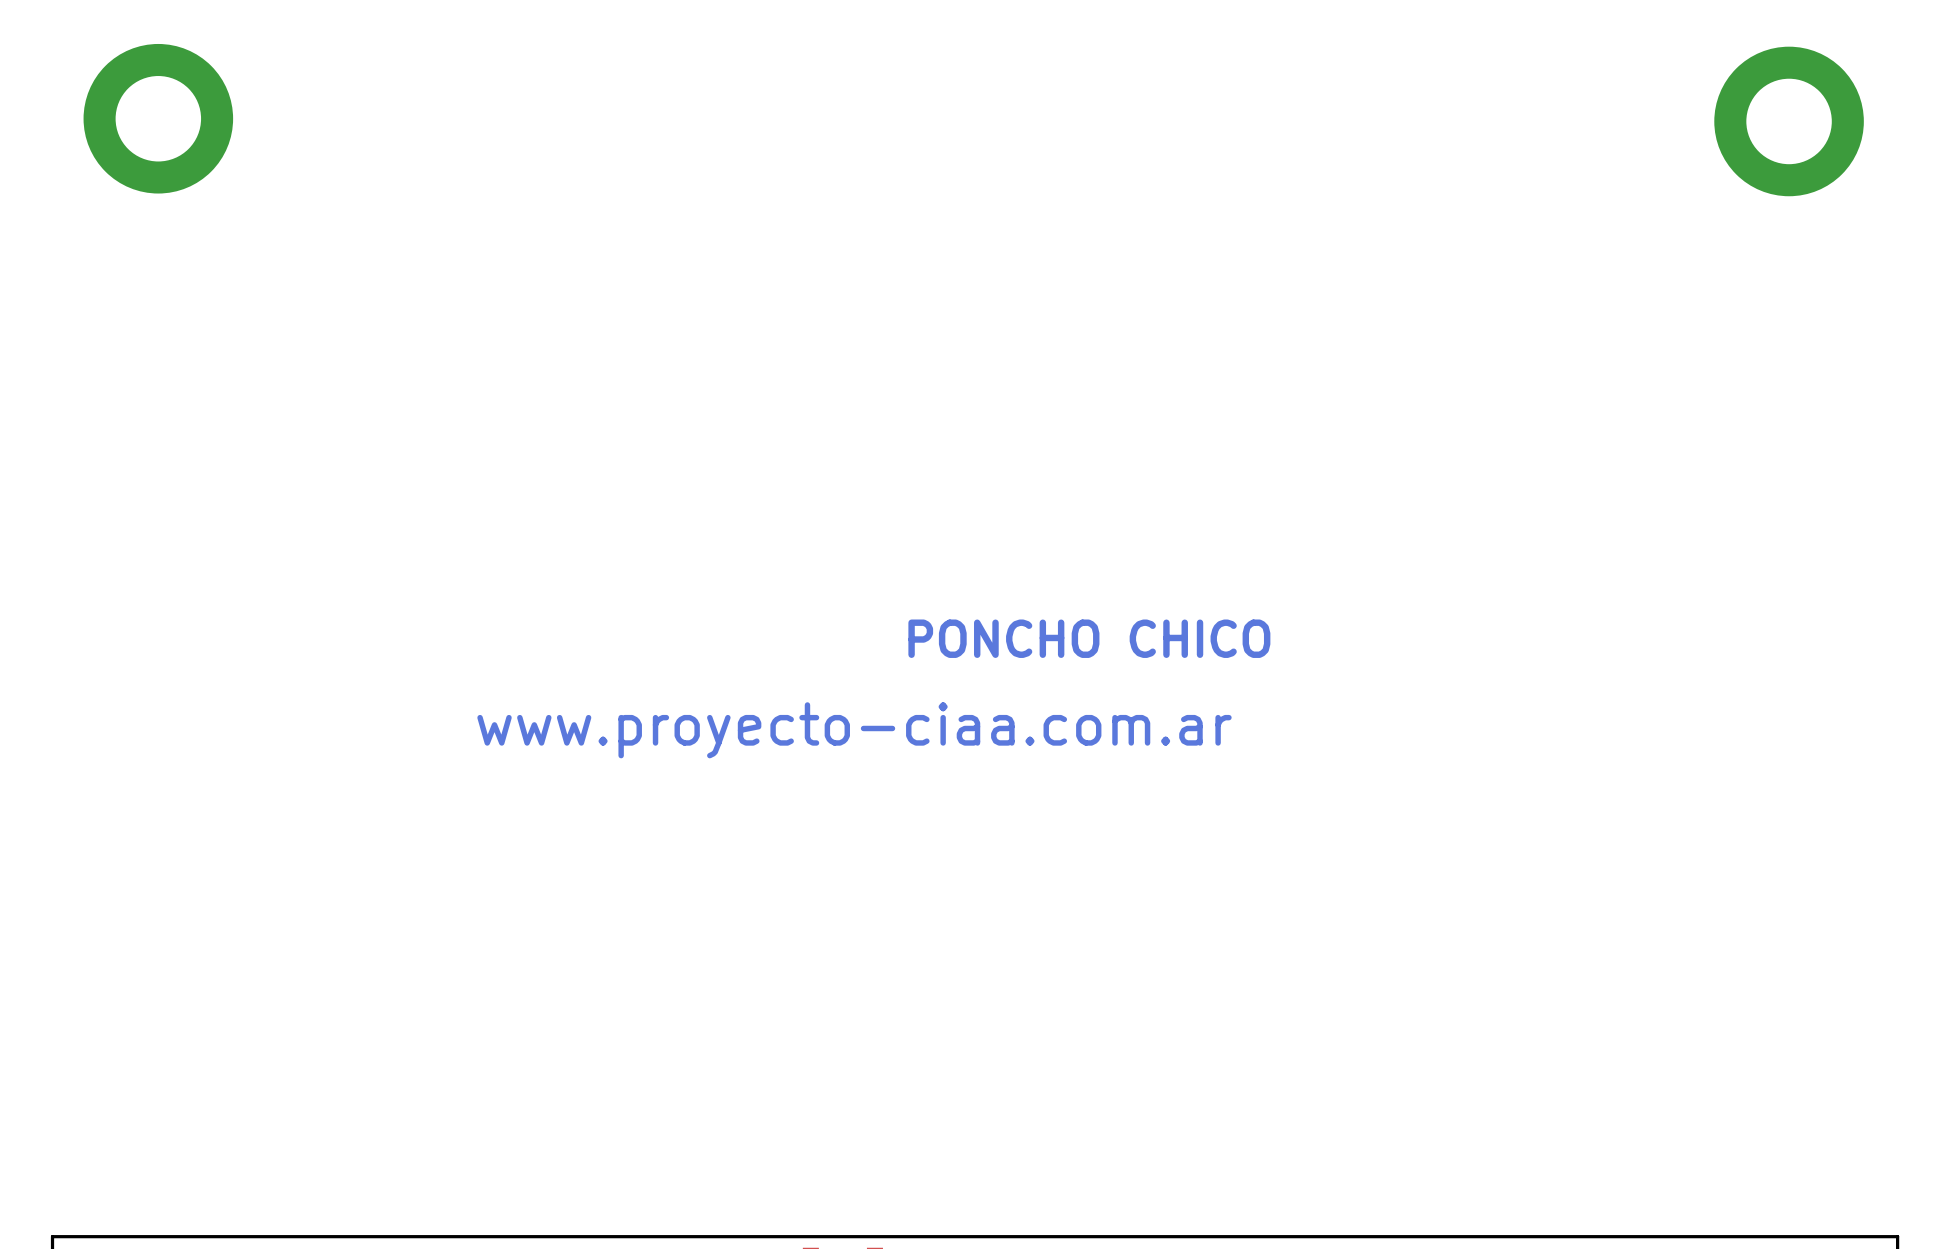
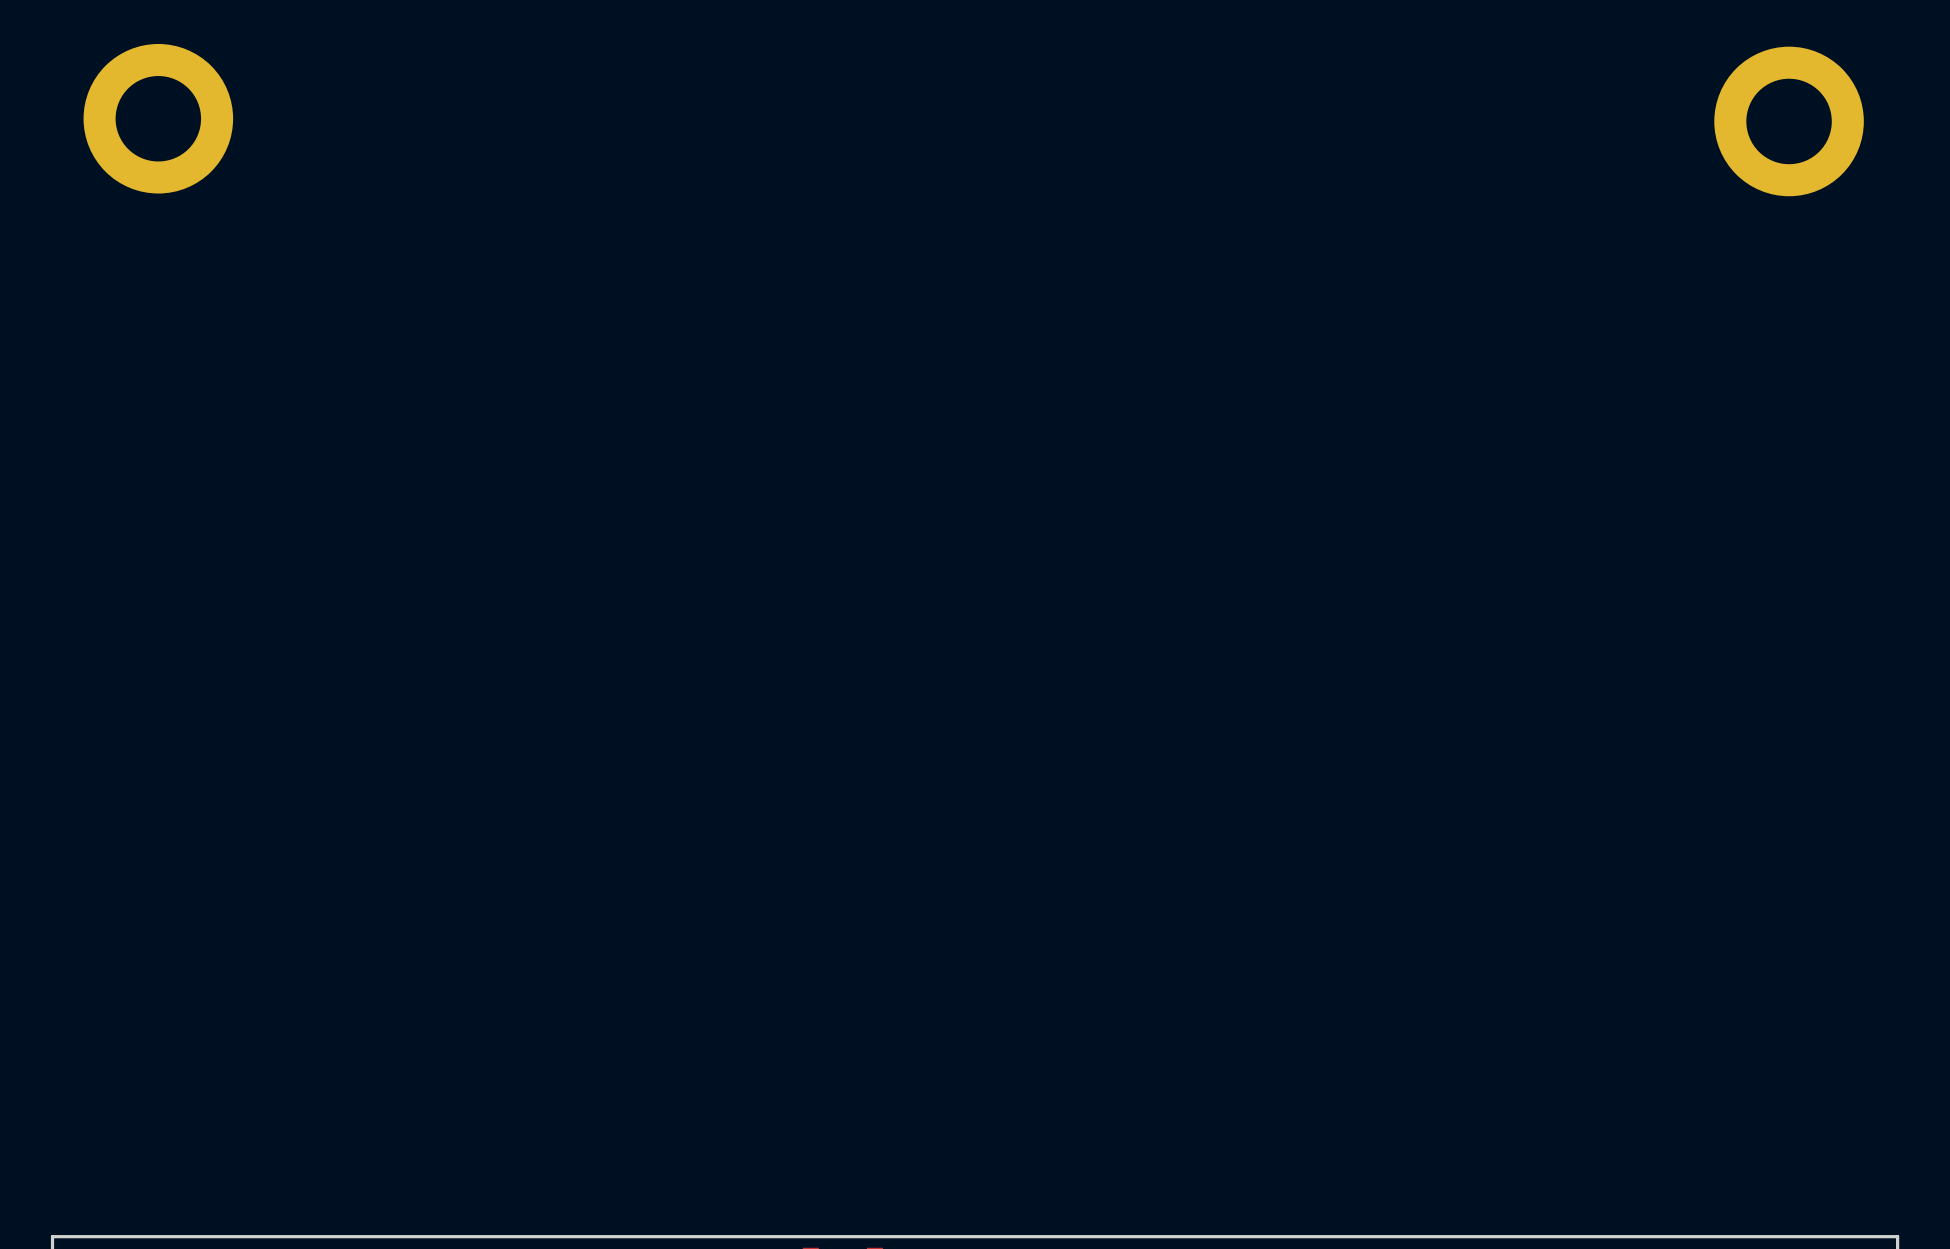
text: PONCHO CHICO (1089, 638) -> none
text: www.proyecto-ciaa.com.ar (854, 730) -> none

